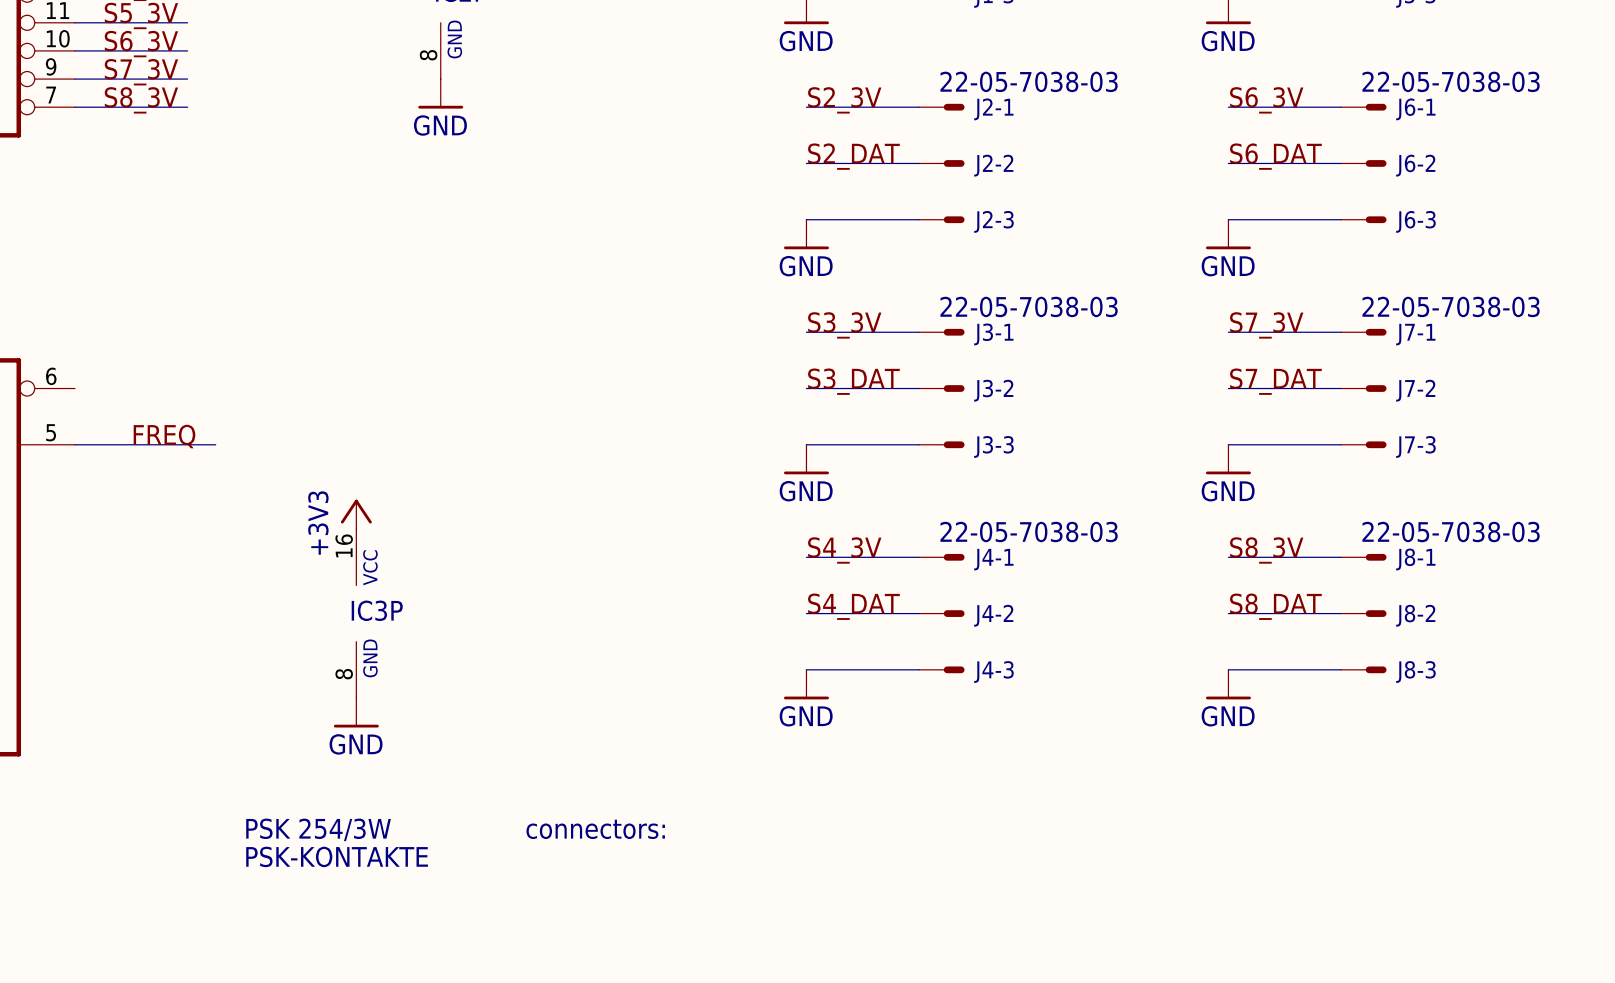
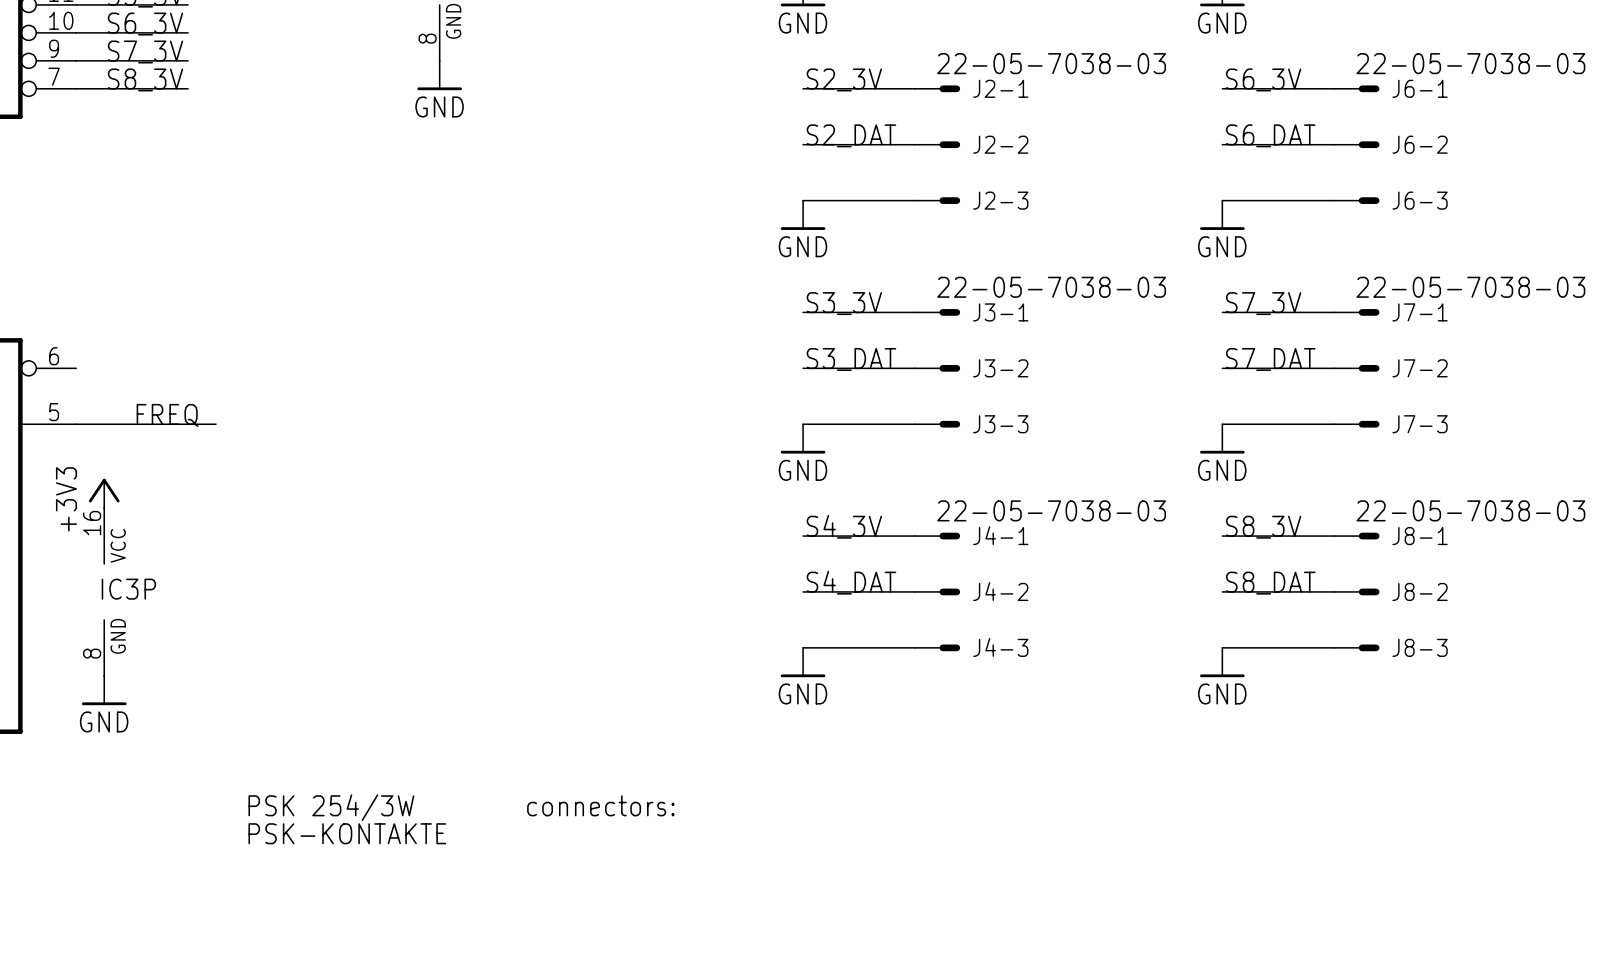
power symbol position: +3V3 (356, 514) -> +3V3 (104, 493)
IC3P position: (356, 613) -> (104, 591)
power symbol position: GND (356, 712) -> GND (104, 690)

